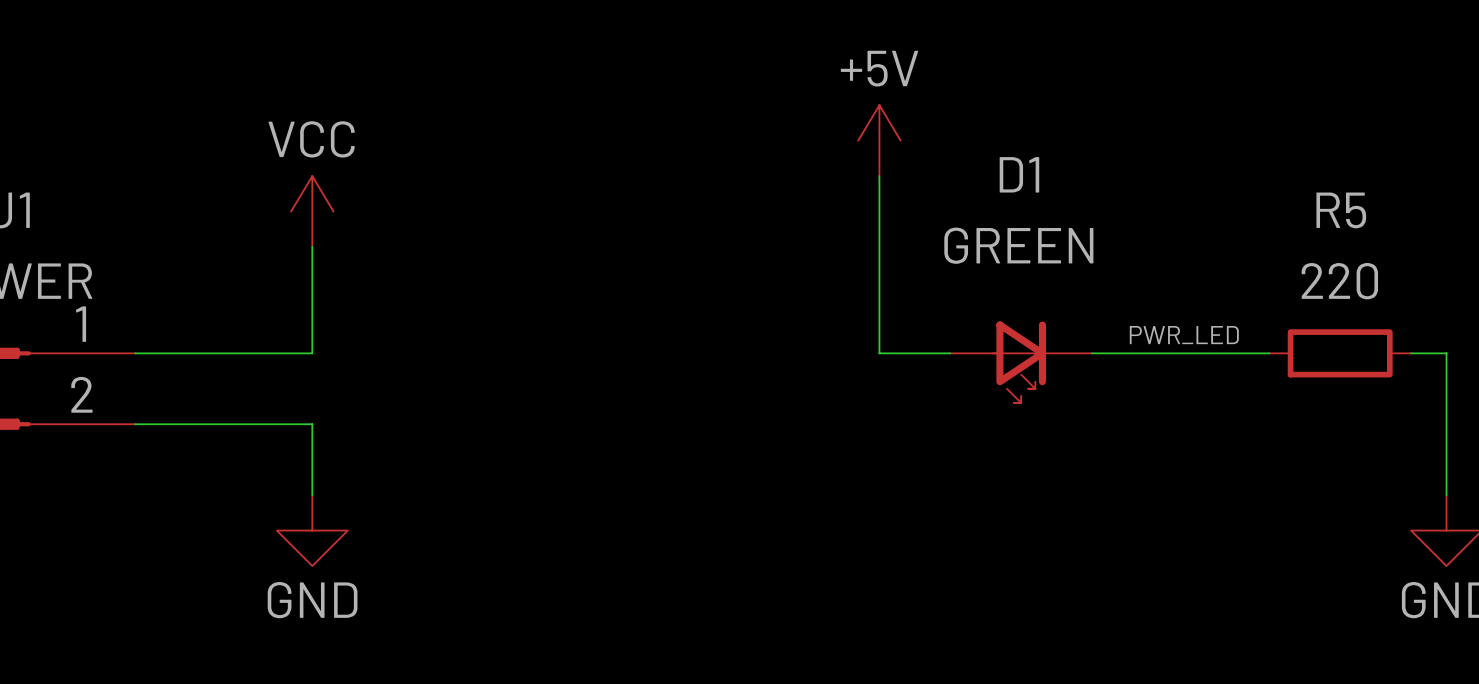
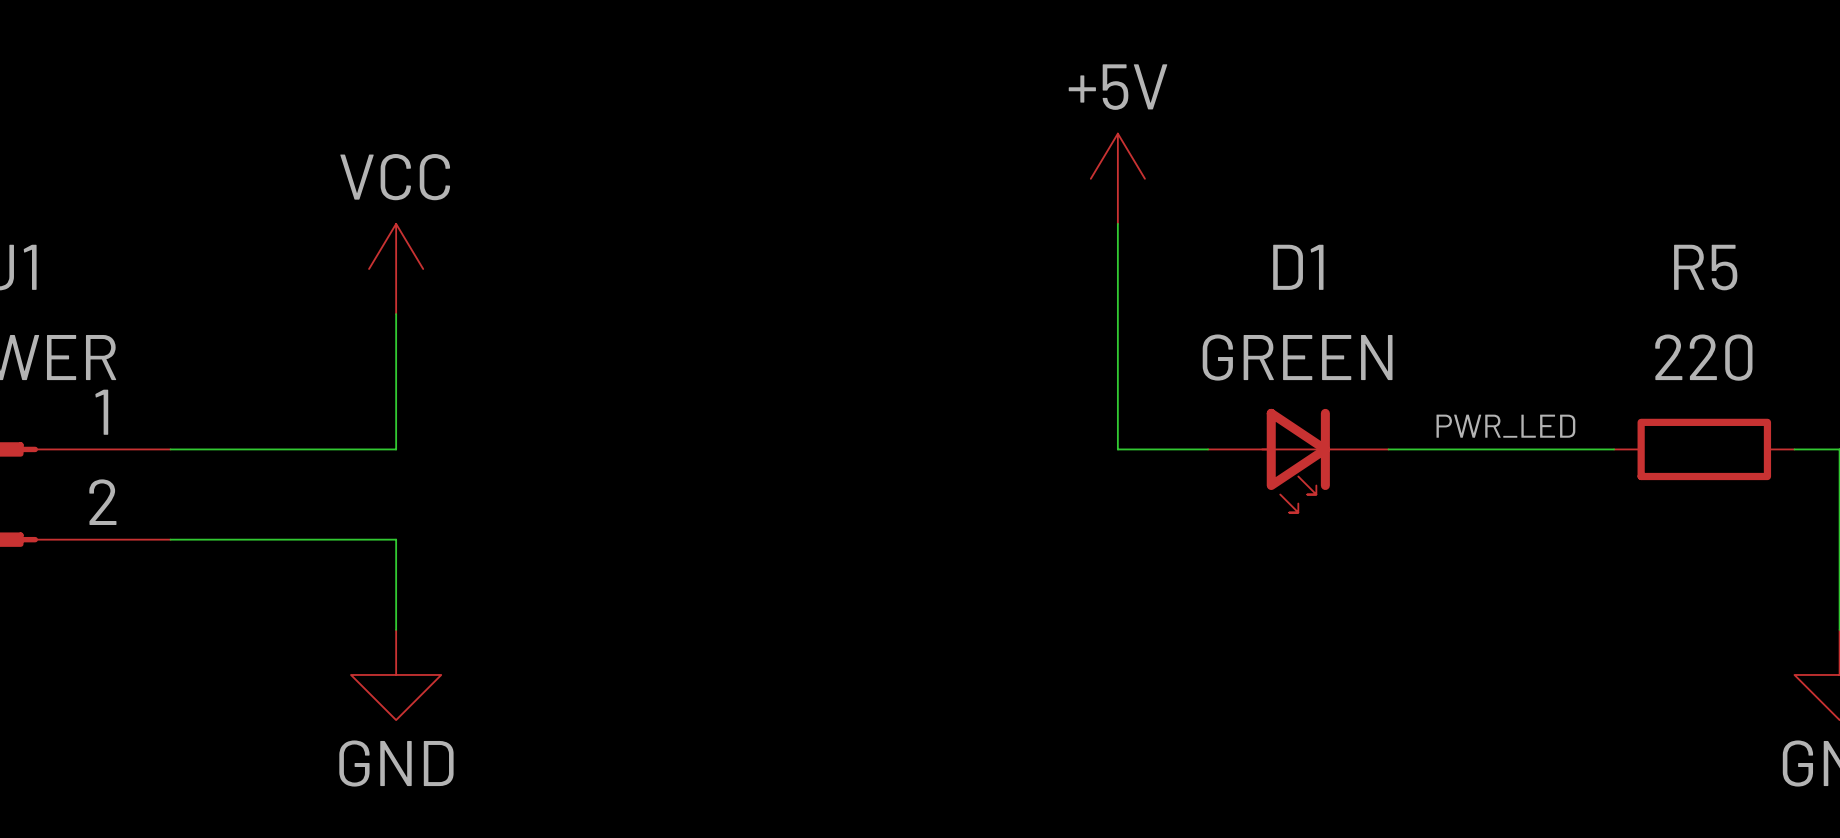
D1 name position: D1 (1019, 174) -> D1 (1298, 267)
D1 value position: GREEN (1018, 245) -> GREEN (1297, 357)

